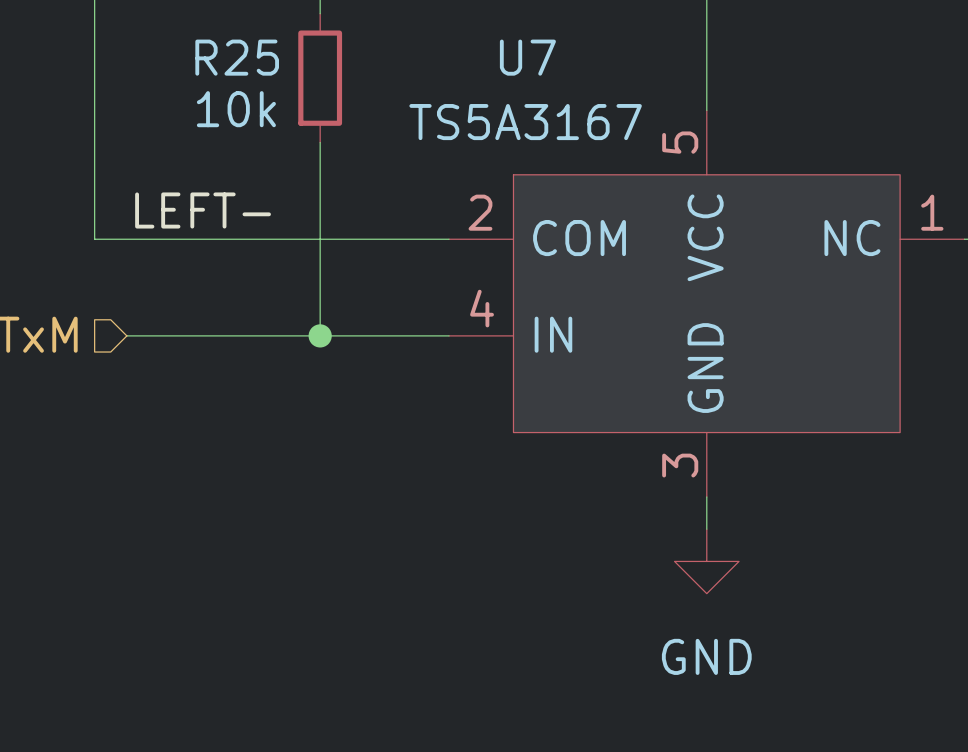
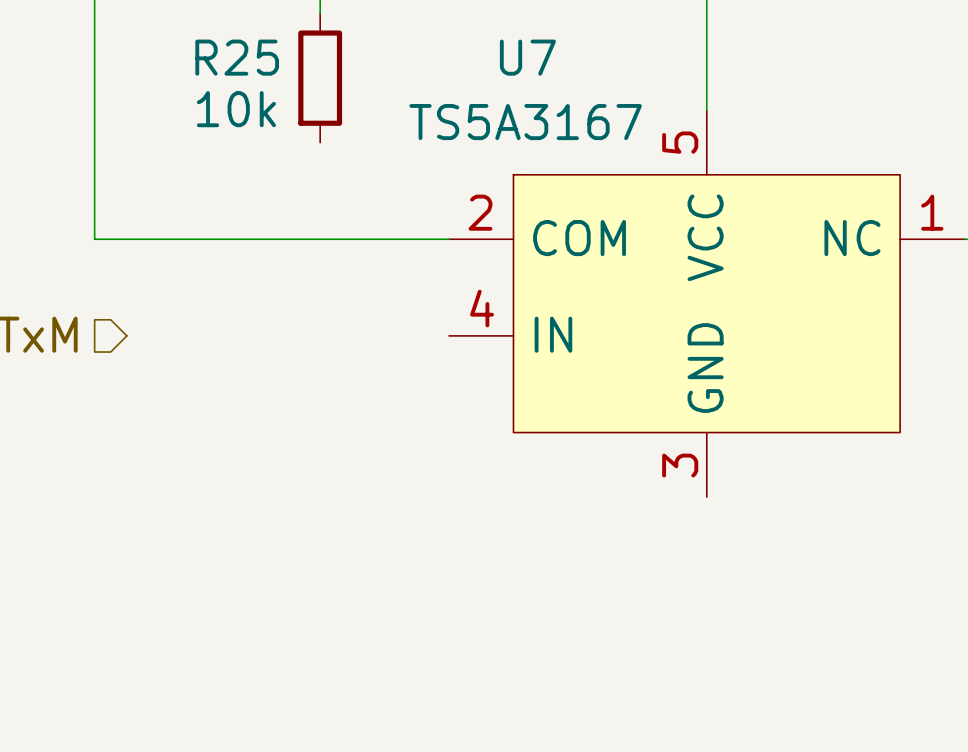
wire: (320, 142) (320, 335) -> none
label: LEFT- (203, 210) -> none
wire: (126, 335) (449, 335) -> none
junction: (320, 335) -> none
wire: (706, 496) (706, 529) -> none
power symbol: GND (706, 561) -> none

